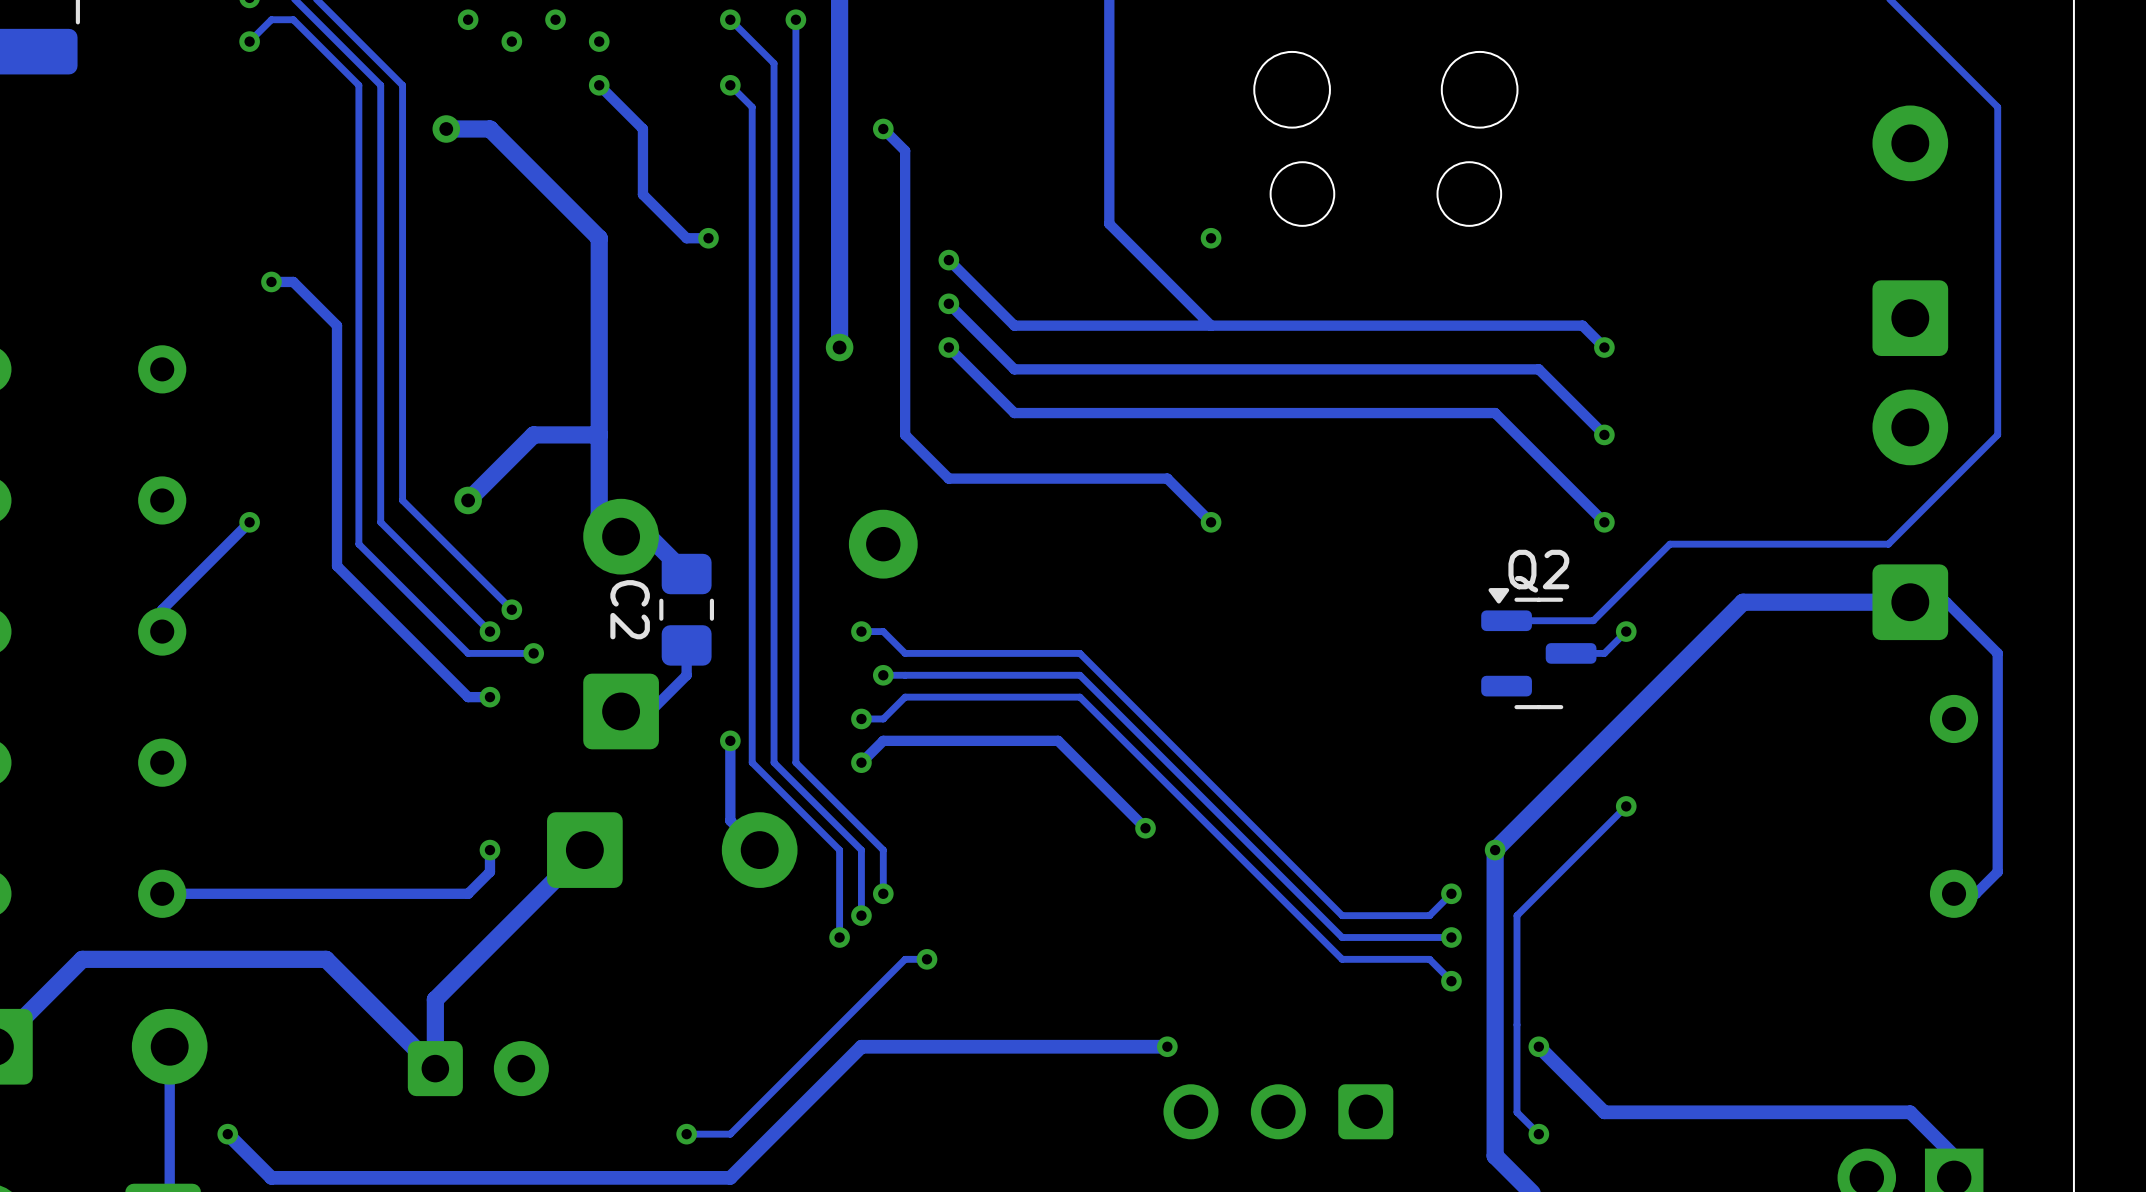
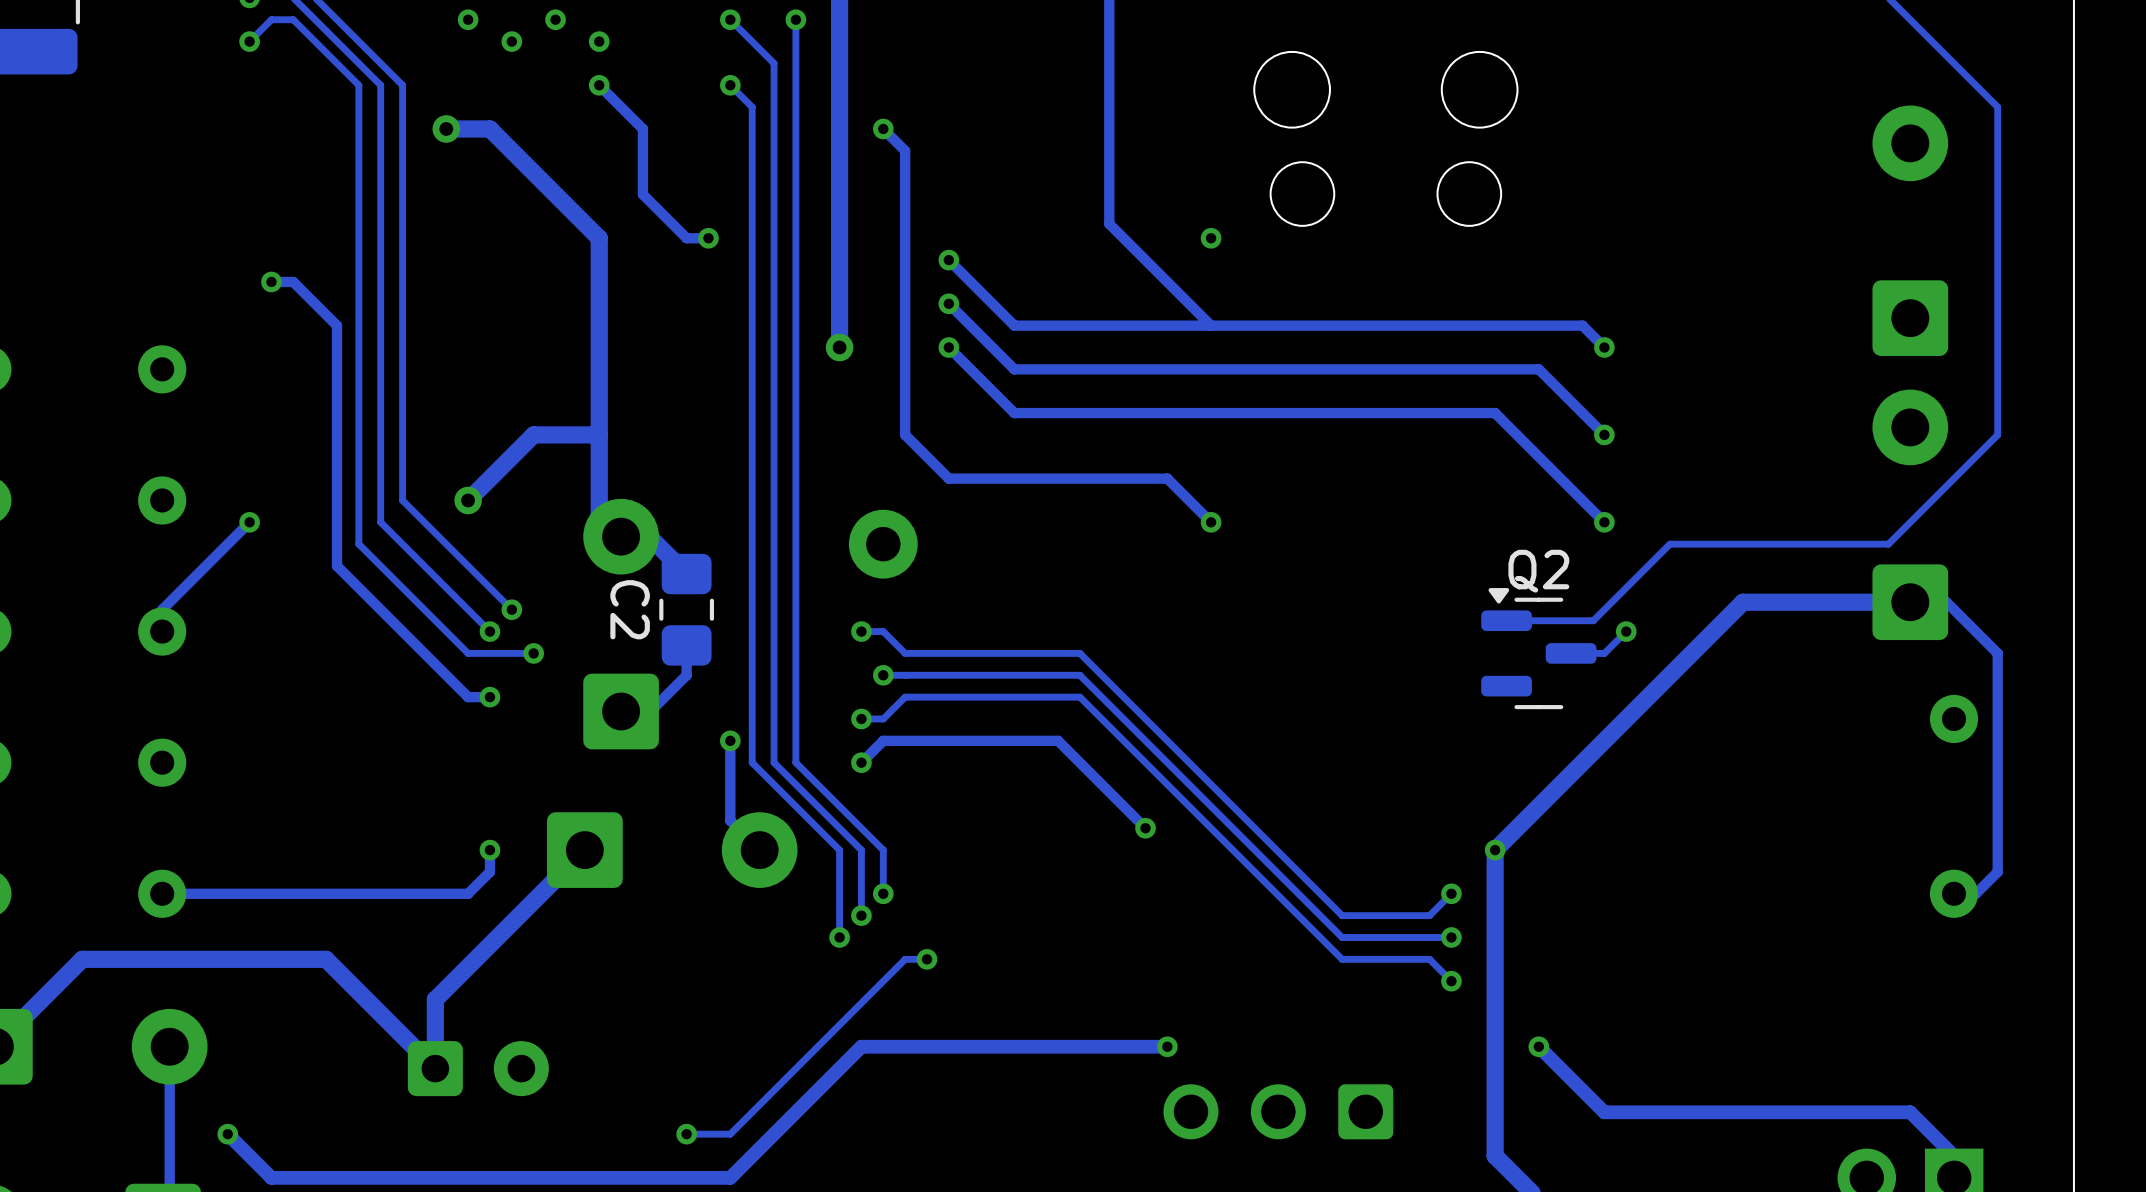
track: (1626, 806) (1516, 915) (1516, 1112) (1538, 1134) -> none
via: (1626, 806) -> none
via: (1538, 1134) -> none

